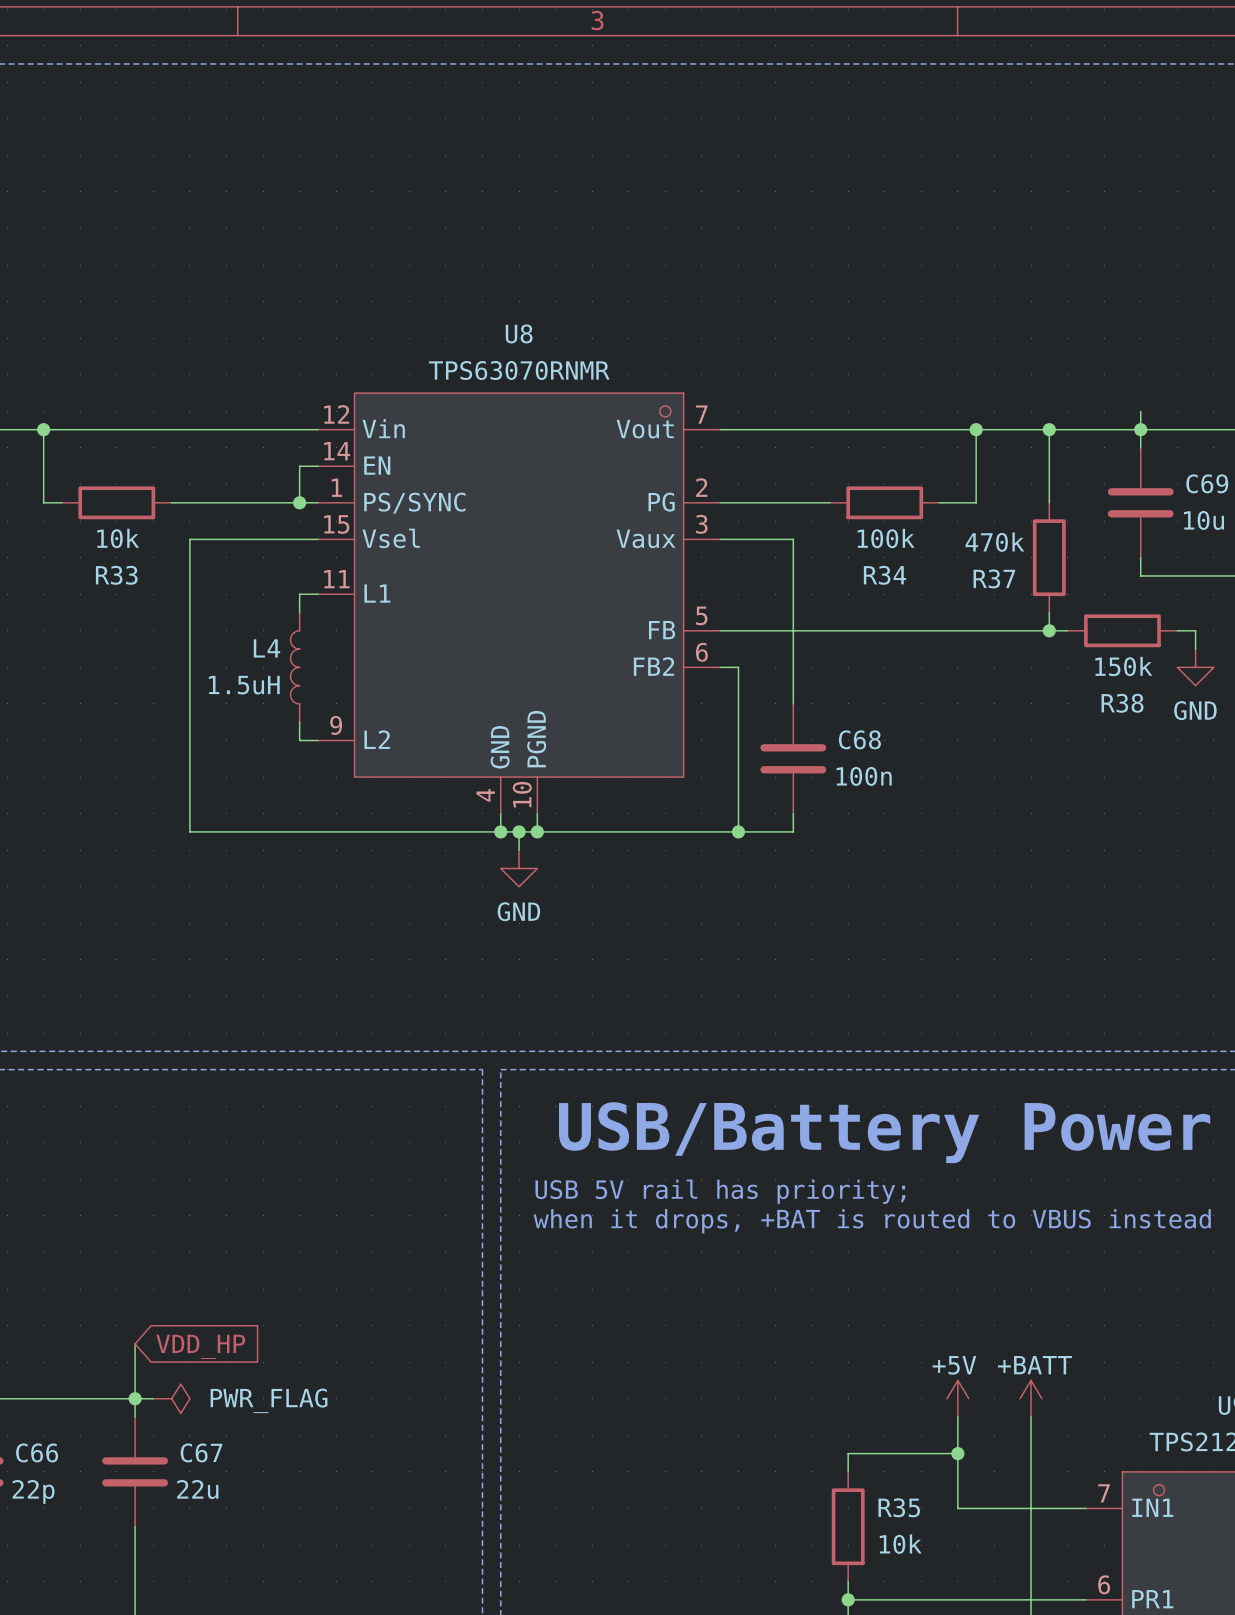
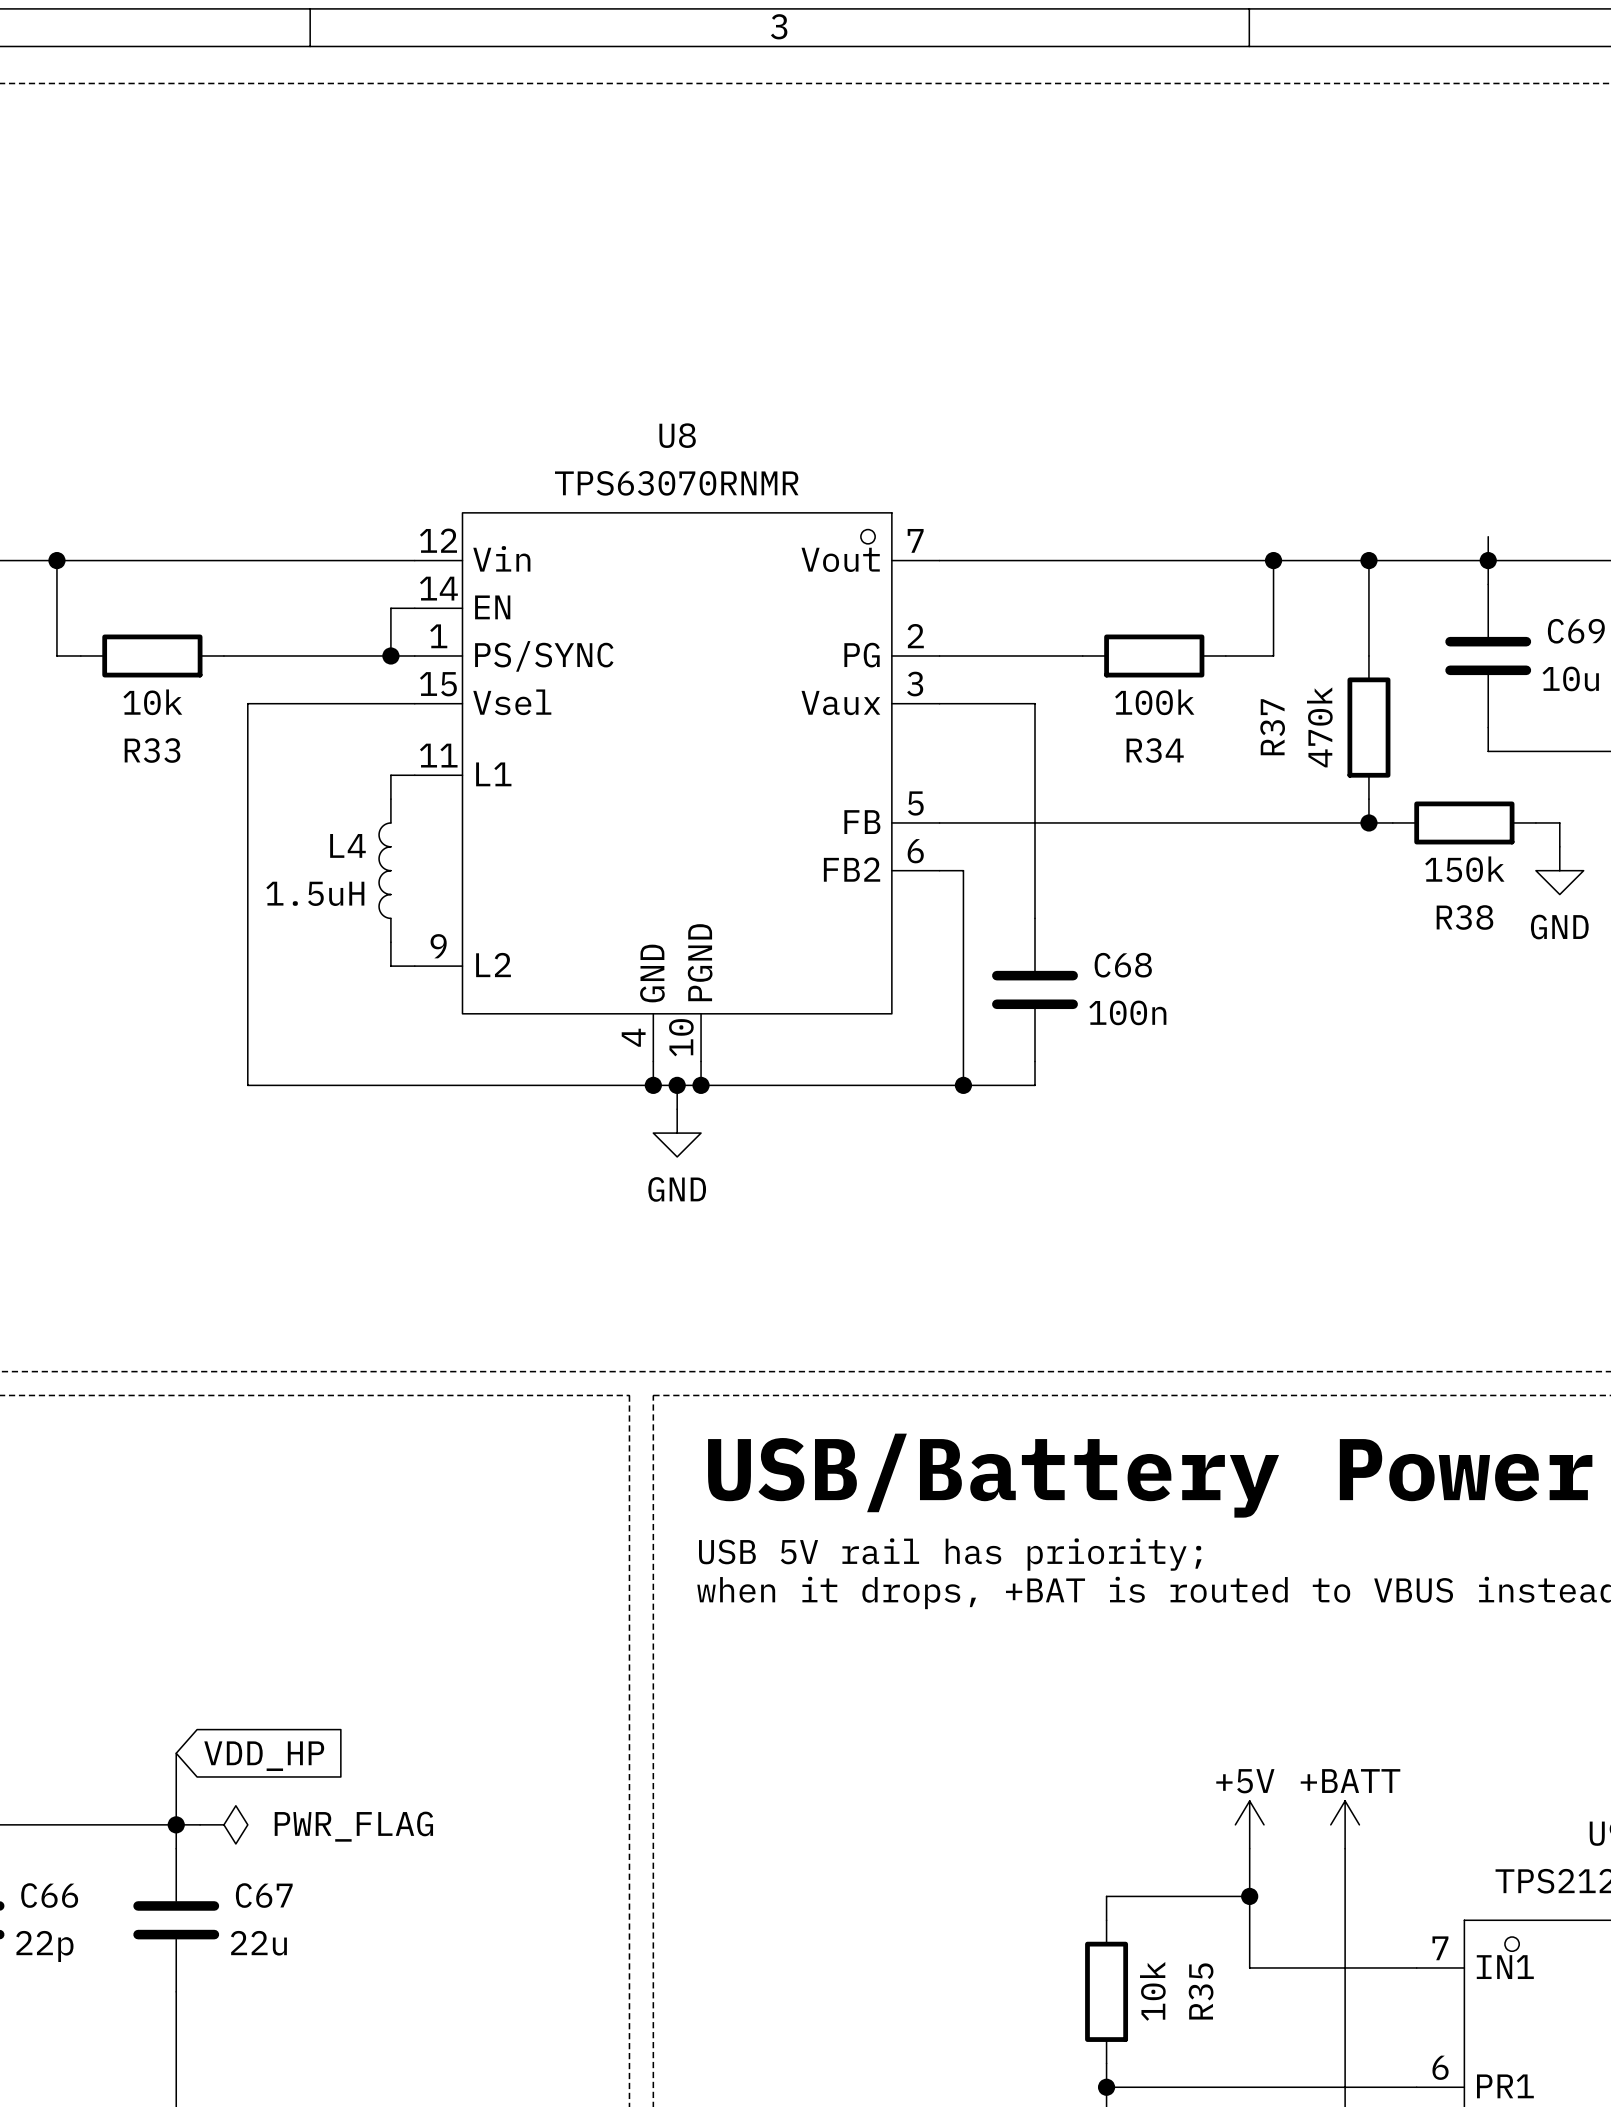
R37 value rotation: 0° (994, 542) -> 90° counterclockwise (1319, 727)
R37 name rotation: 0° (994, 578) -> 90° counterclockwise (1272, 727)
R35 name rotation: 0° (899, 1507) -> 90° counterclockwise (1201, 1991)
R35 value rotation: 0° (900, 1544) -> 90° counterclockwise (1152, 1991)

